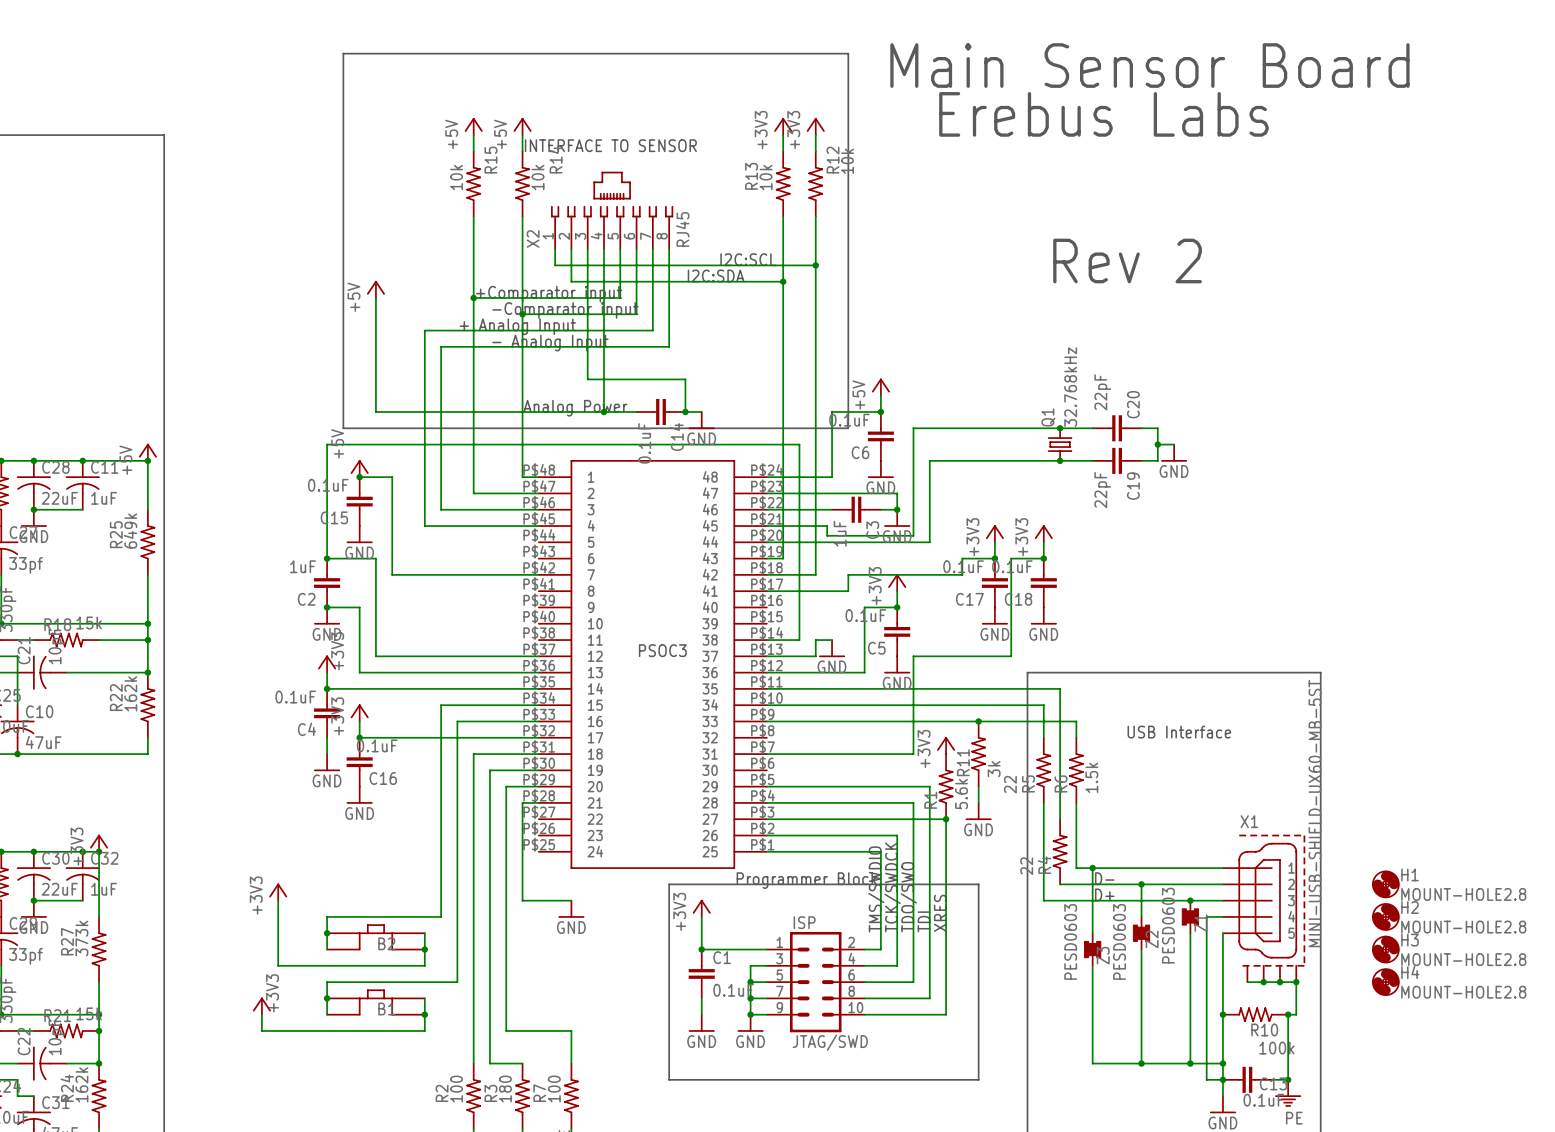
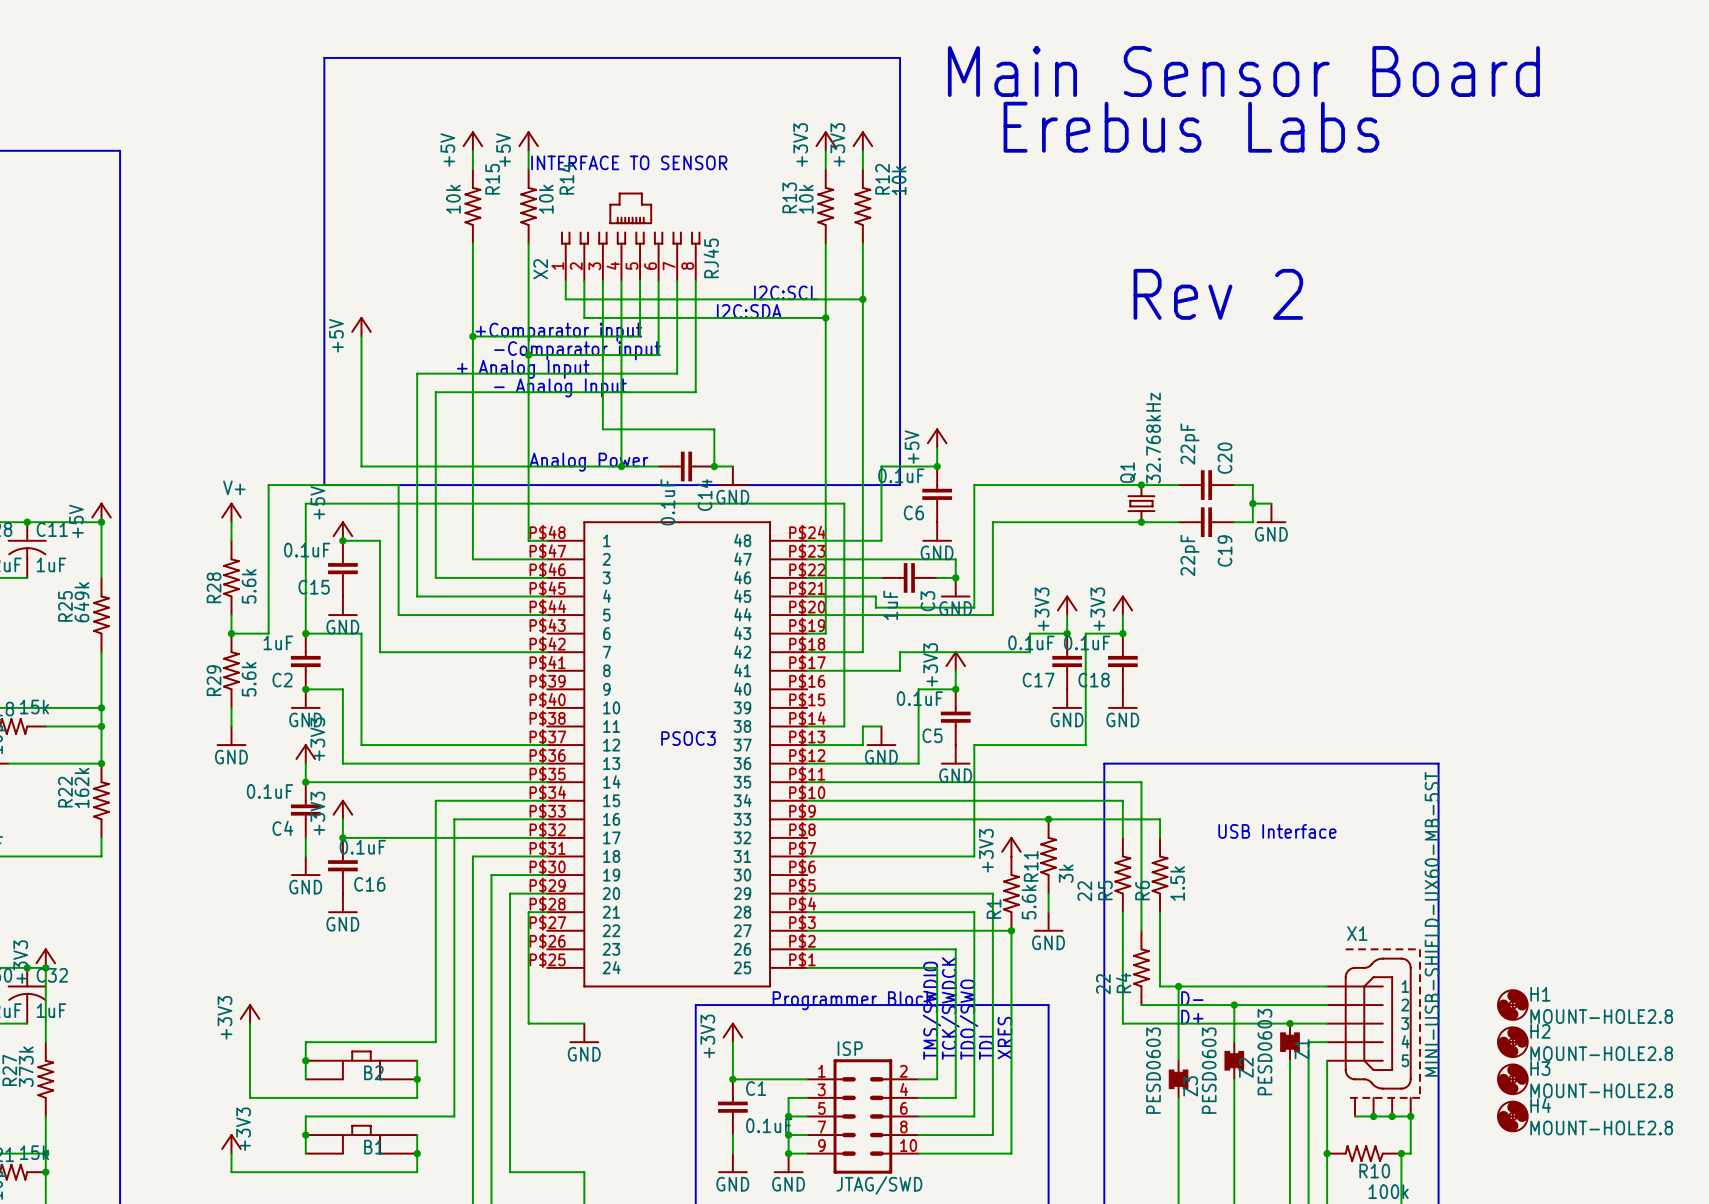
power symbol: none -> V+ (231, 512)
wire: none -> (231, 522) (231, 540)
R28: none -> 5.6k (231, 577)
wire: none -> (231, 615) (231, 633) (268, 633) (268, 485) (398, 485) (398, 615) (547, 615)
junction: none -> (231, 633)
R29: none -> 5.6k (231, 670)
wire: none -> (231, 707) (231, 726)
power symbol: none -> GND (231, 736)

